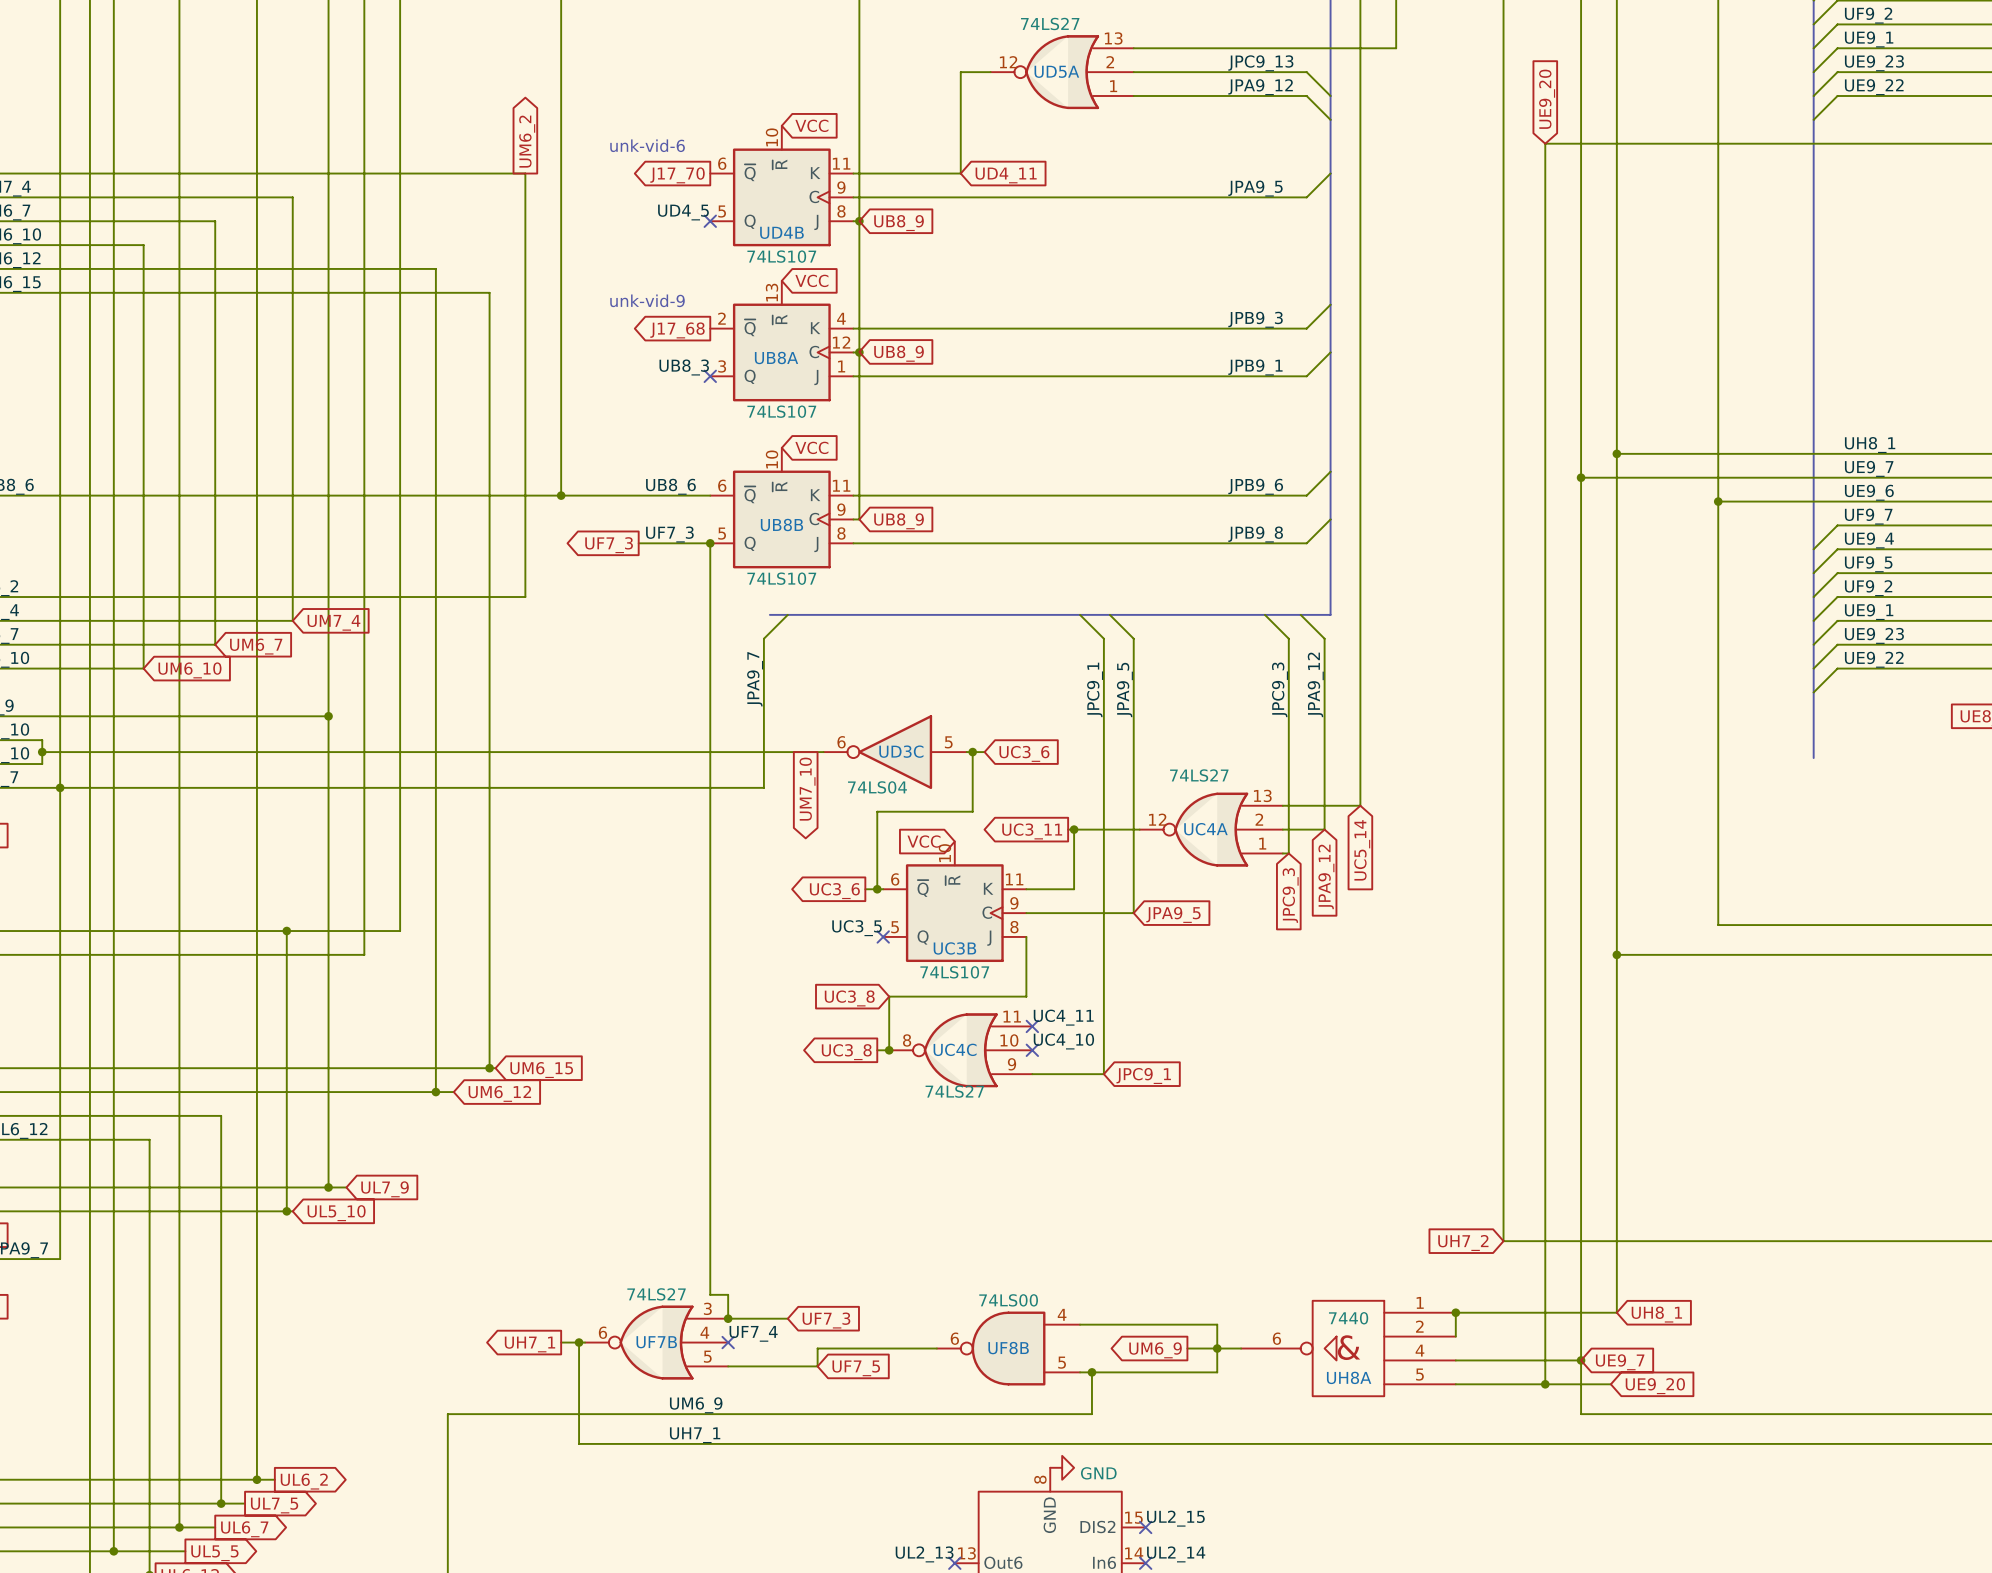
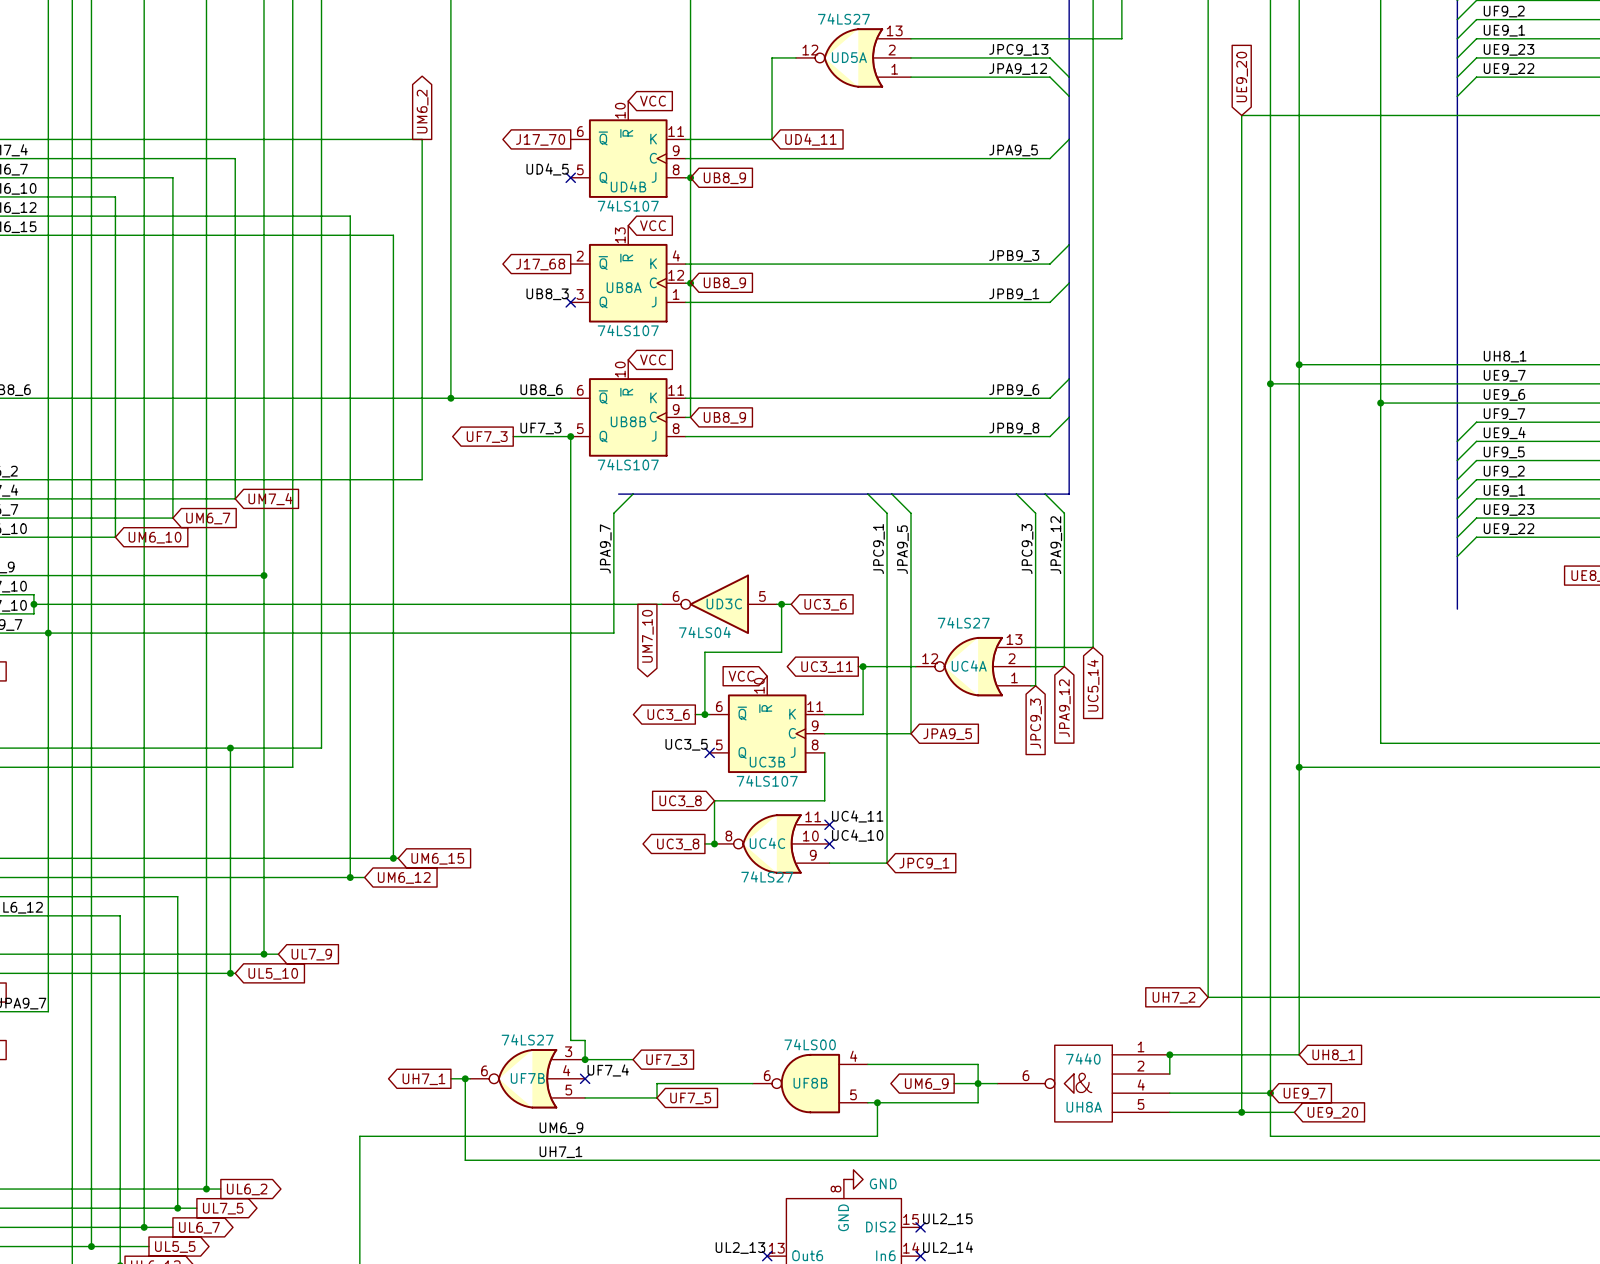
text: unk-vid-6 (647, 145) -> none
text: unk-vid-9 (647, 300) -> none

